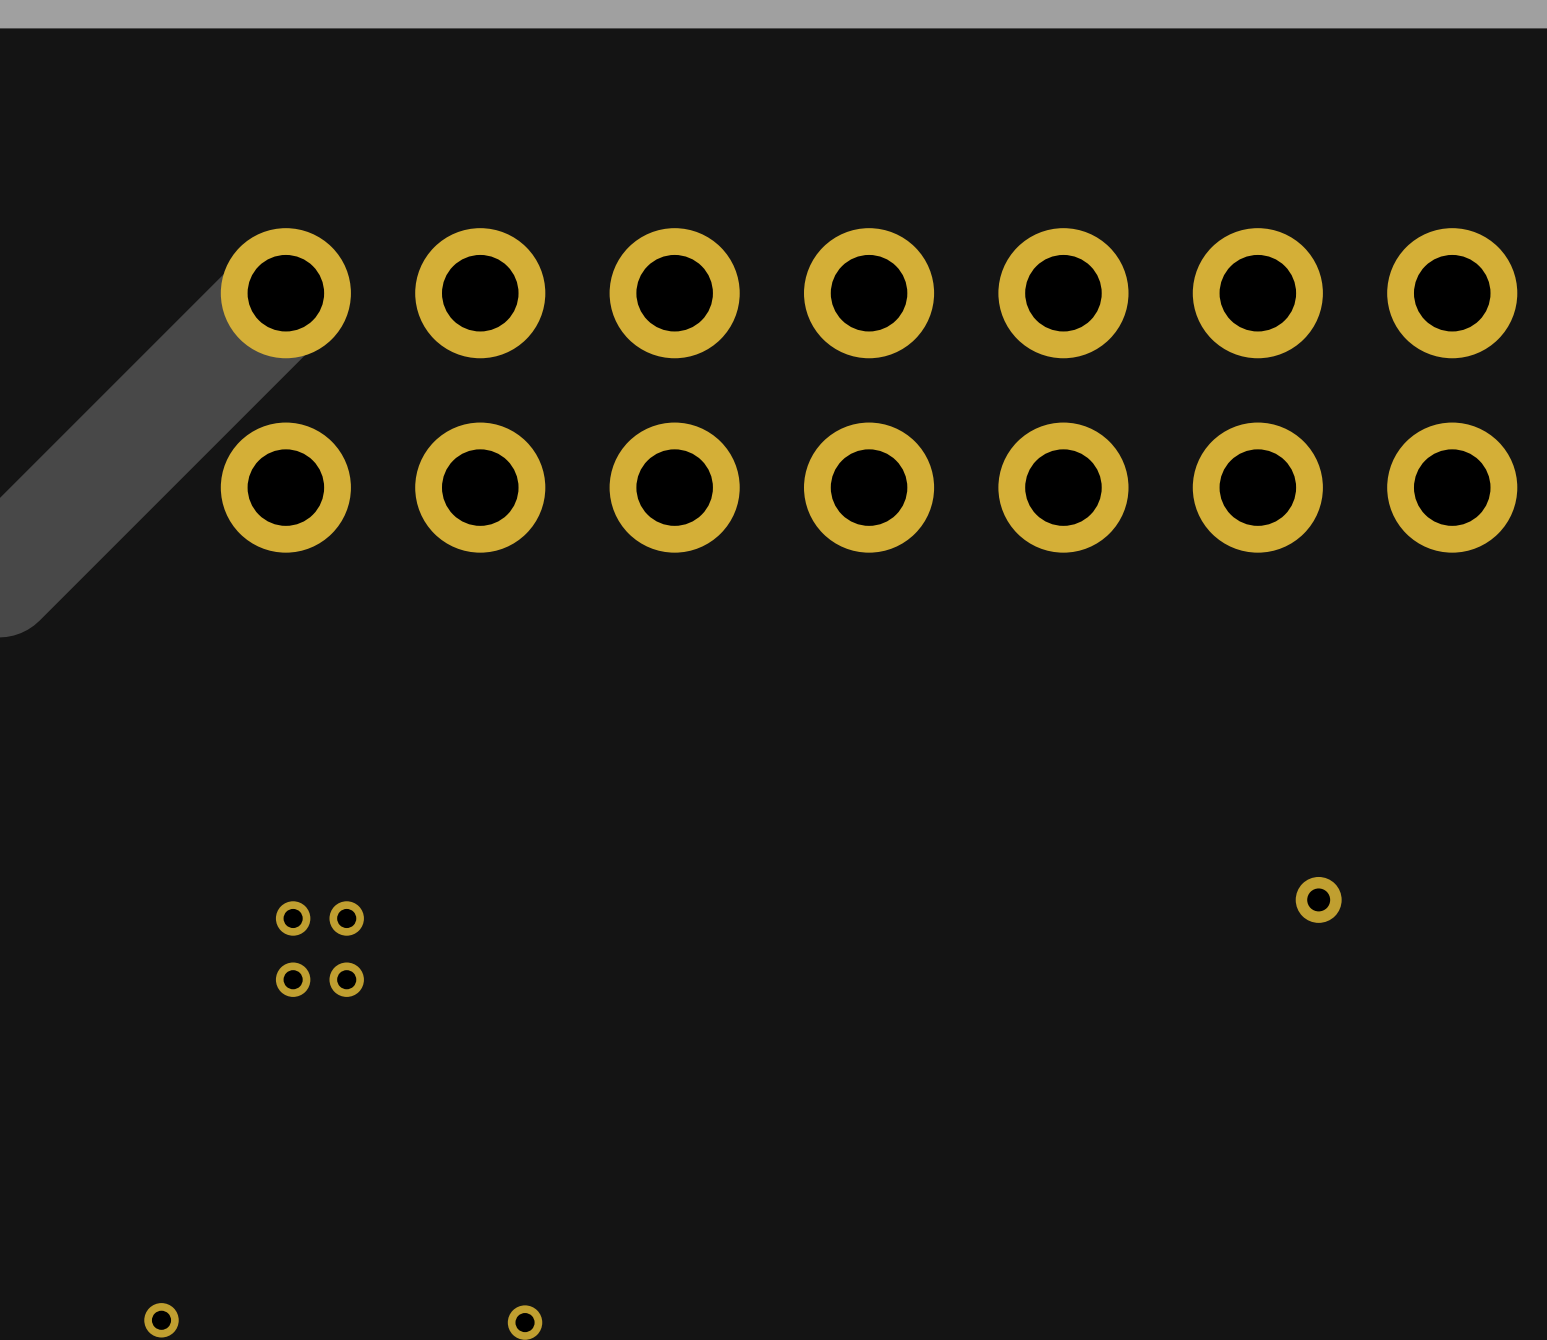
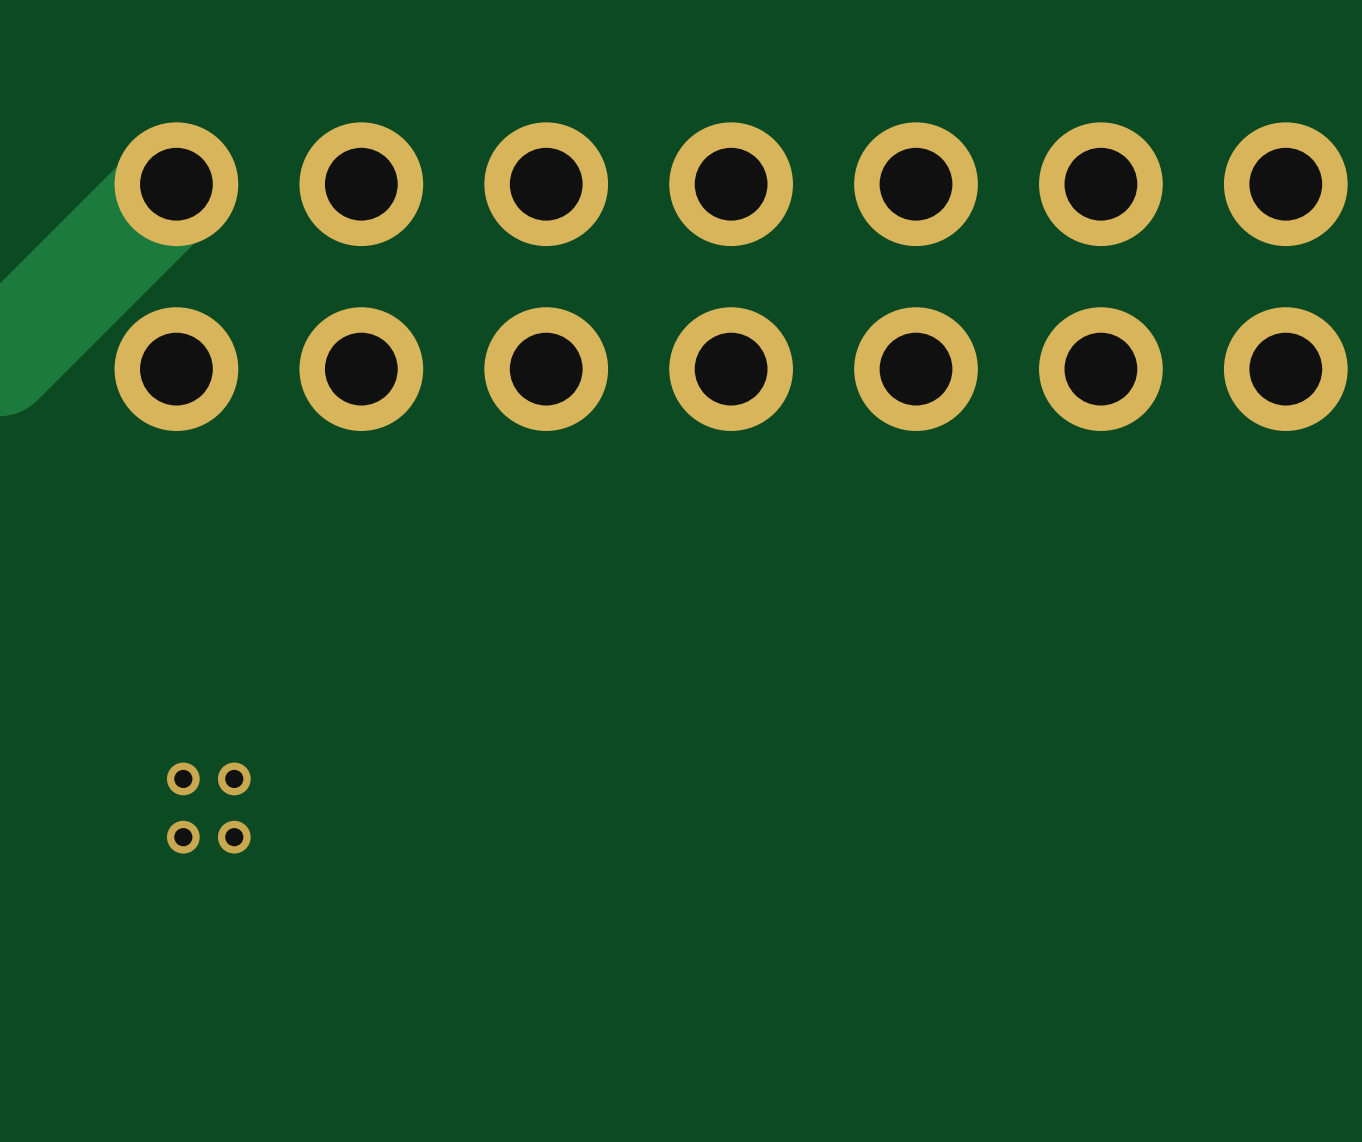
via: (1318, 899) -> none

